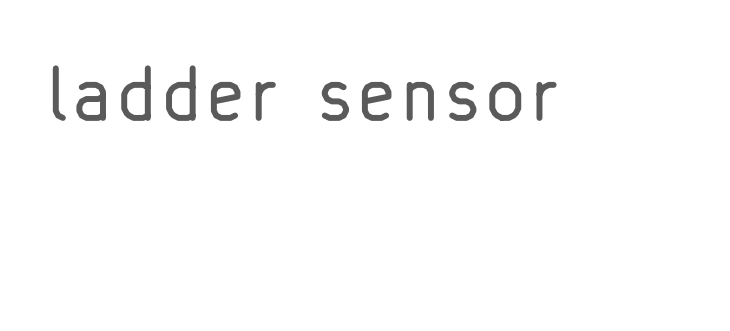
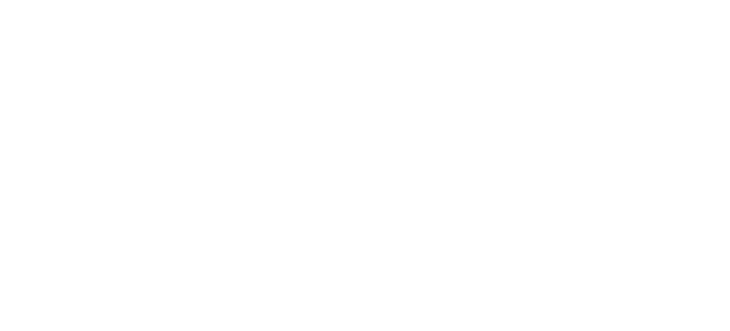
text: ladder sensor (304, 93) -> none

